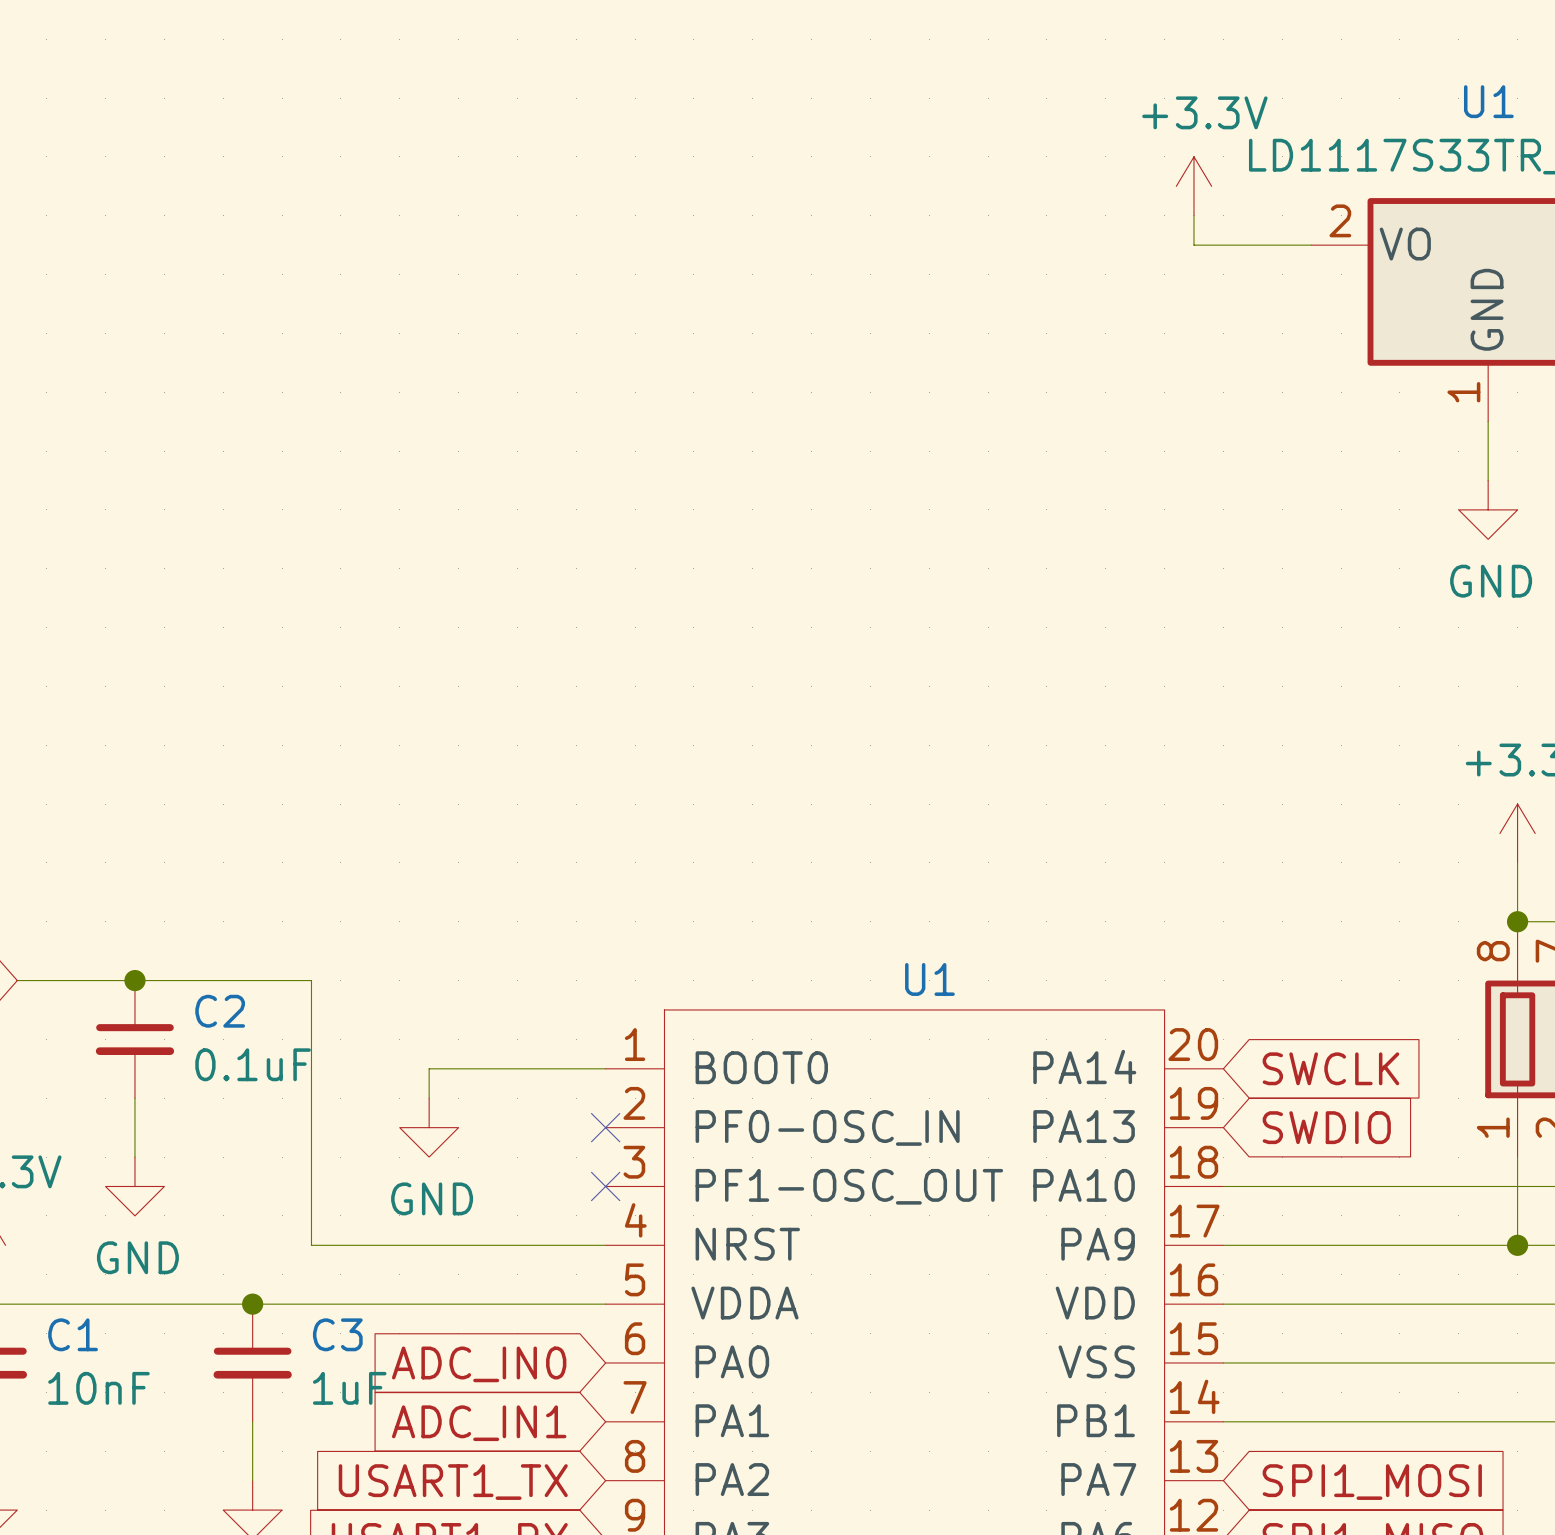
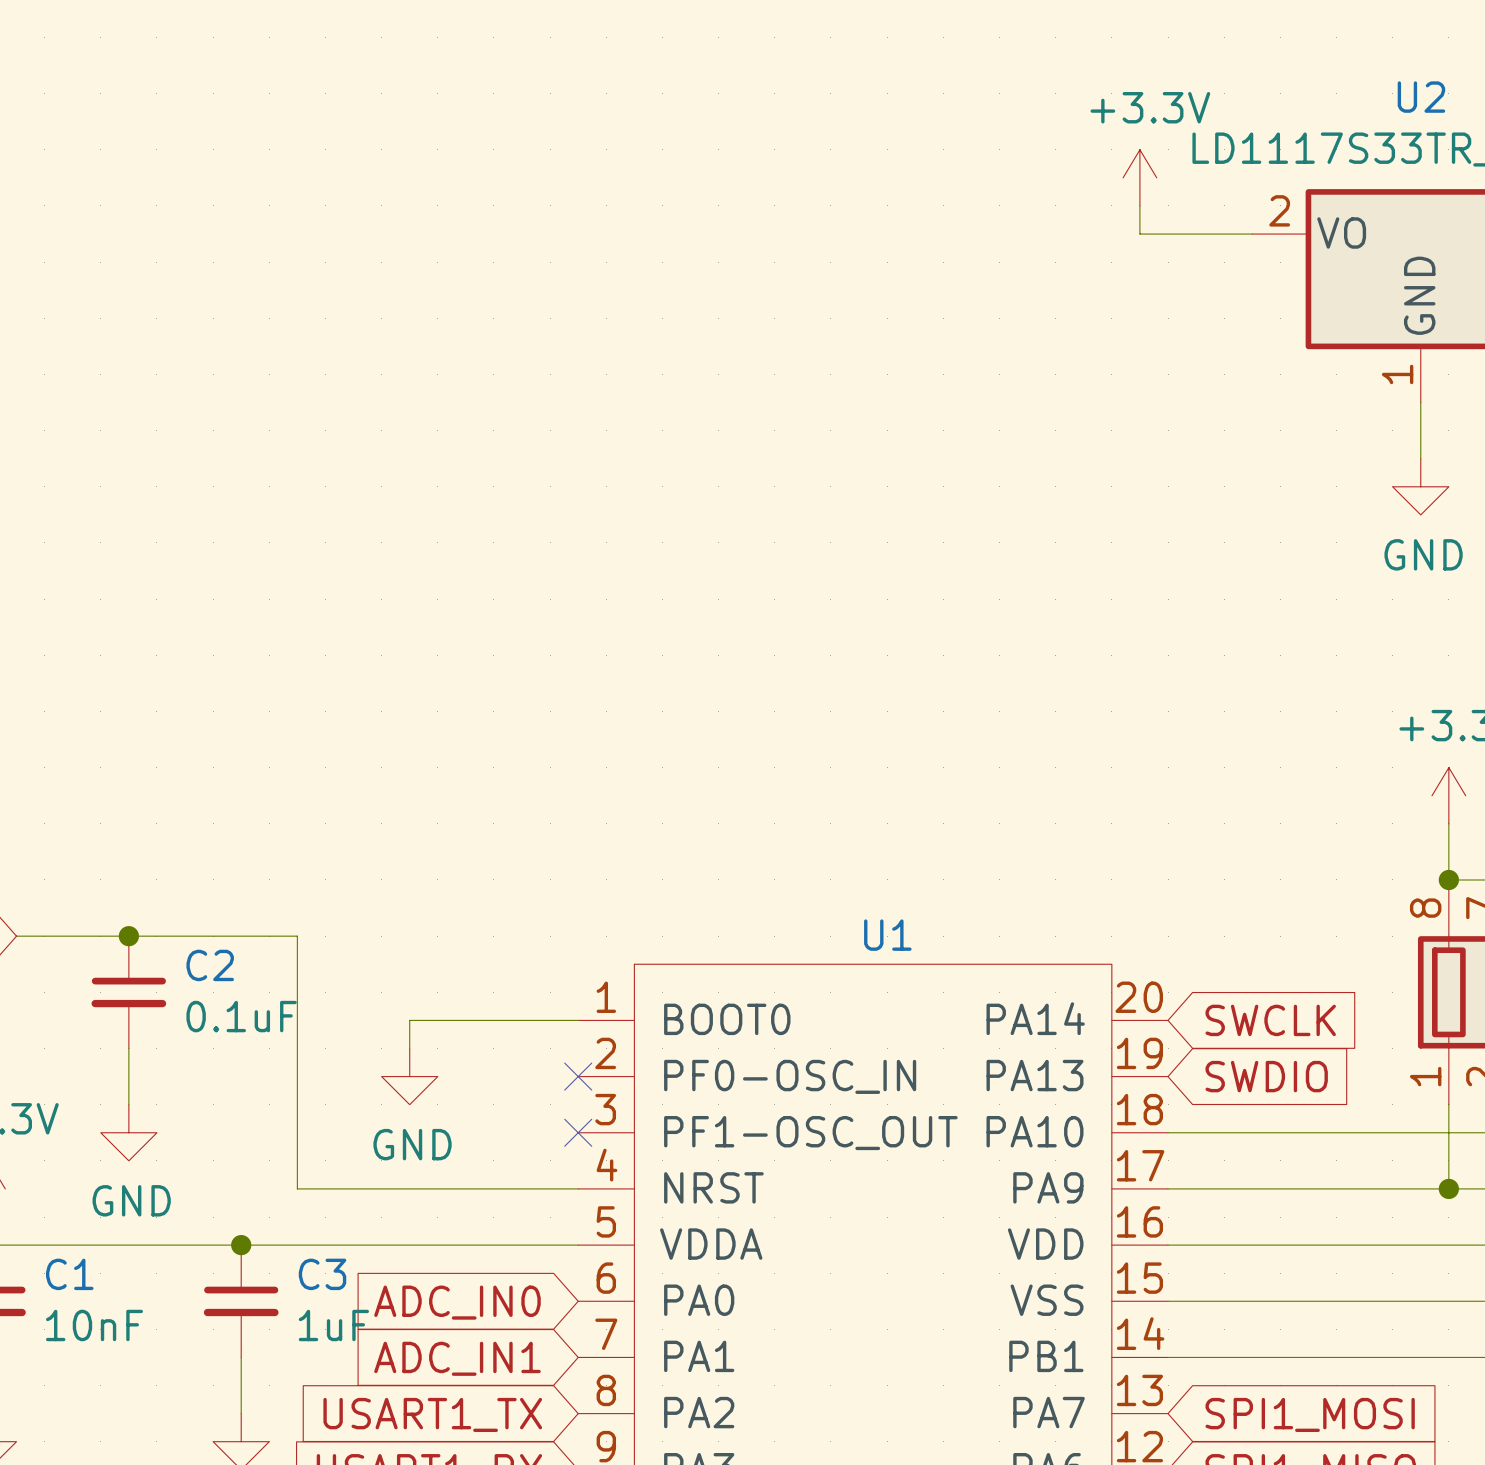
U1 name: U1 (1488, 101) -> U2 (1421, 97)

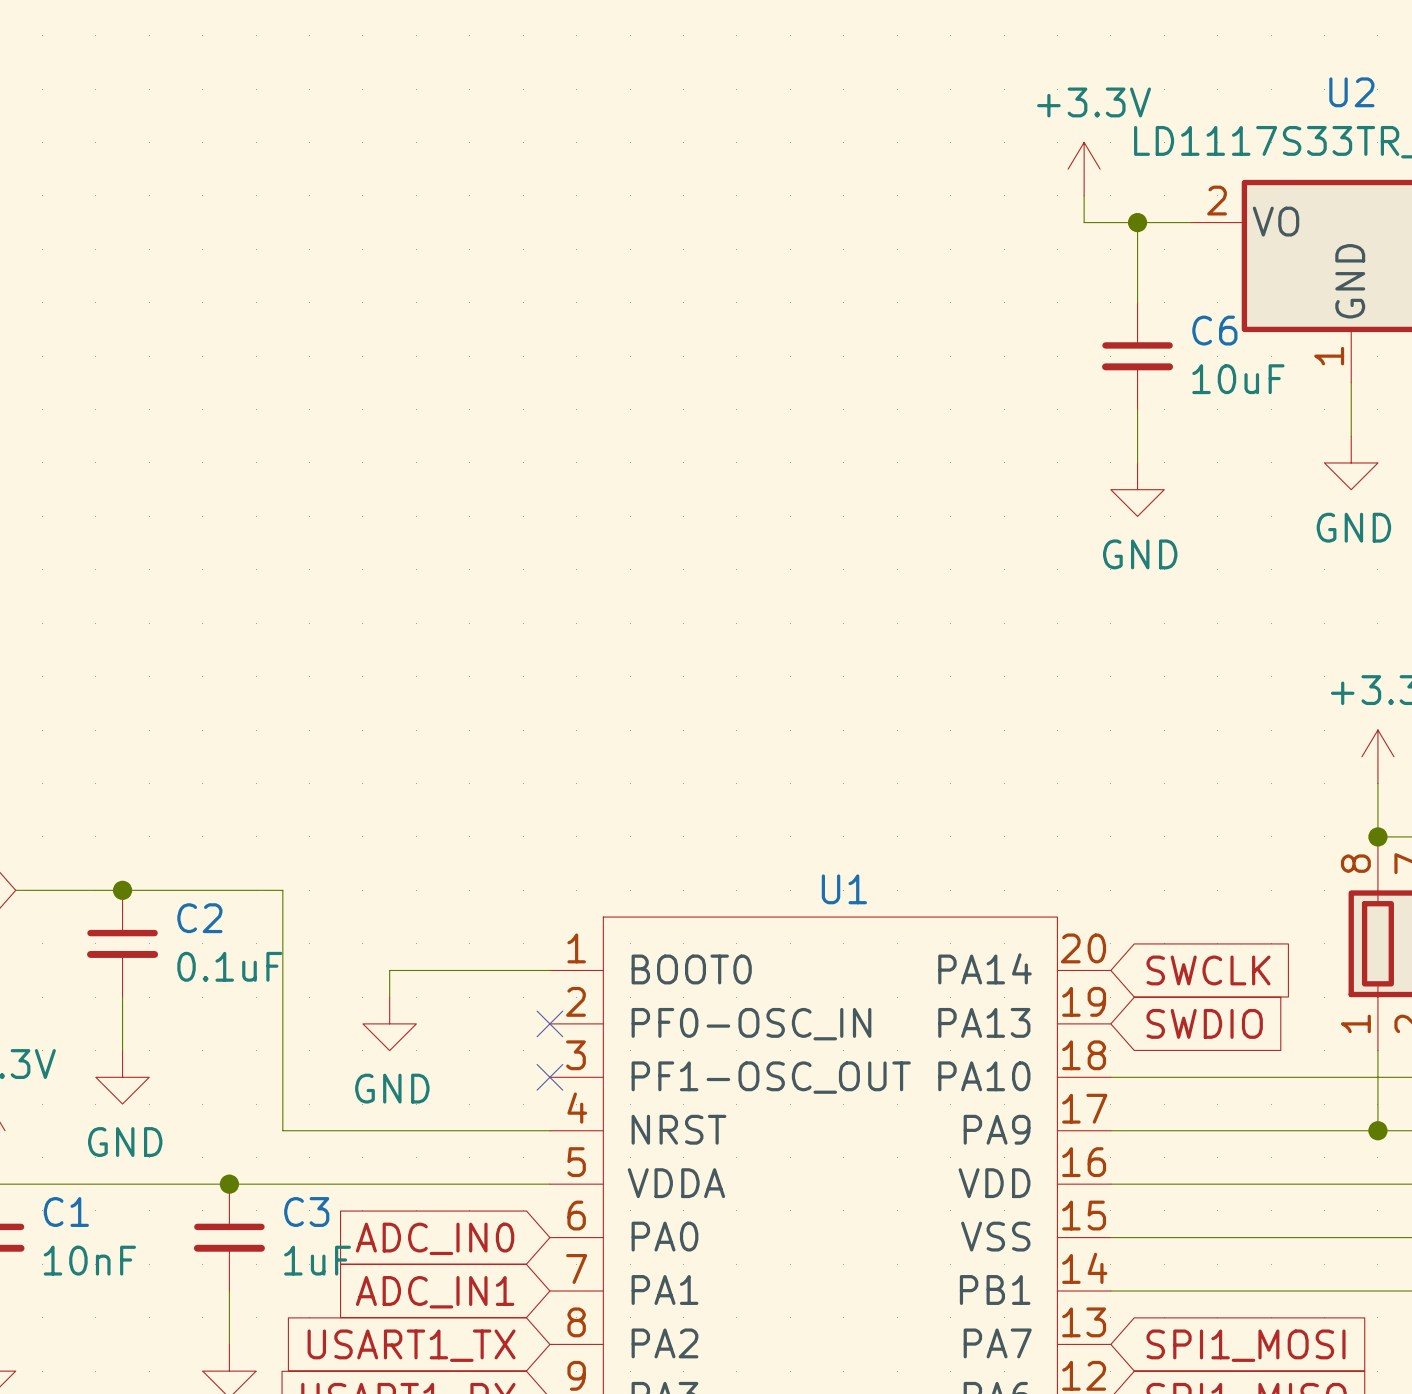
wire: none -> (1137, 222) (1137, 302)
junction: none -> (1137, 222)
C6: none -> 10uF (1137, 356)
wire: none -> (1137, 409) (1137, 462)
power symbol: none -> GND (1137, 489)

